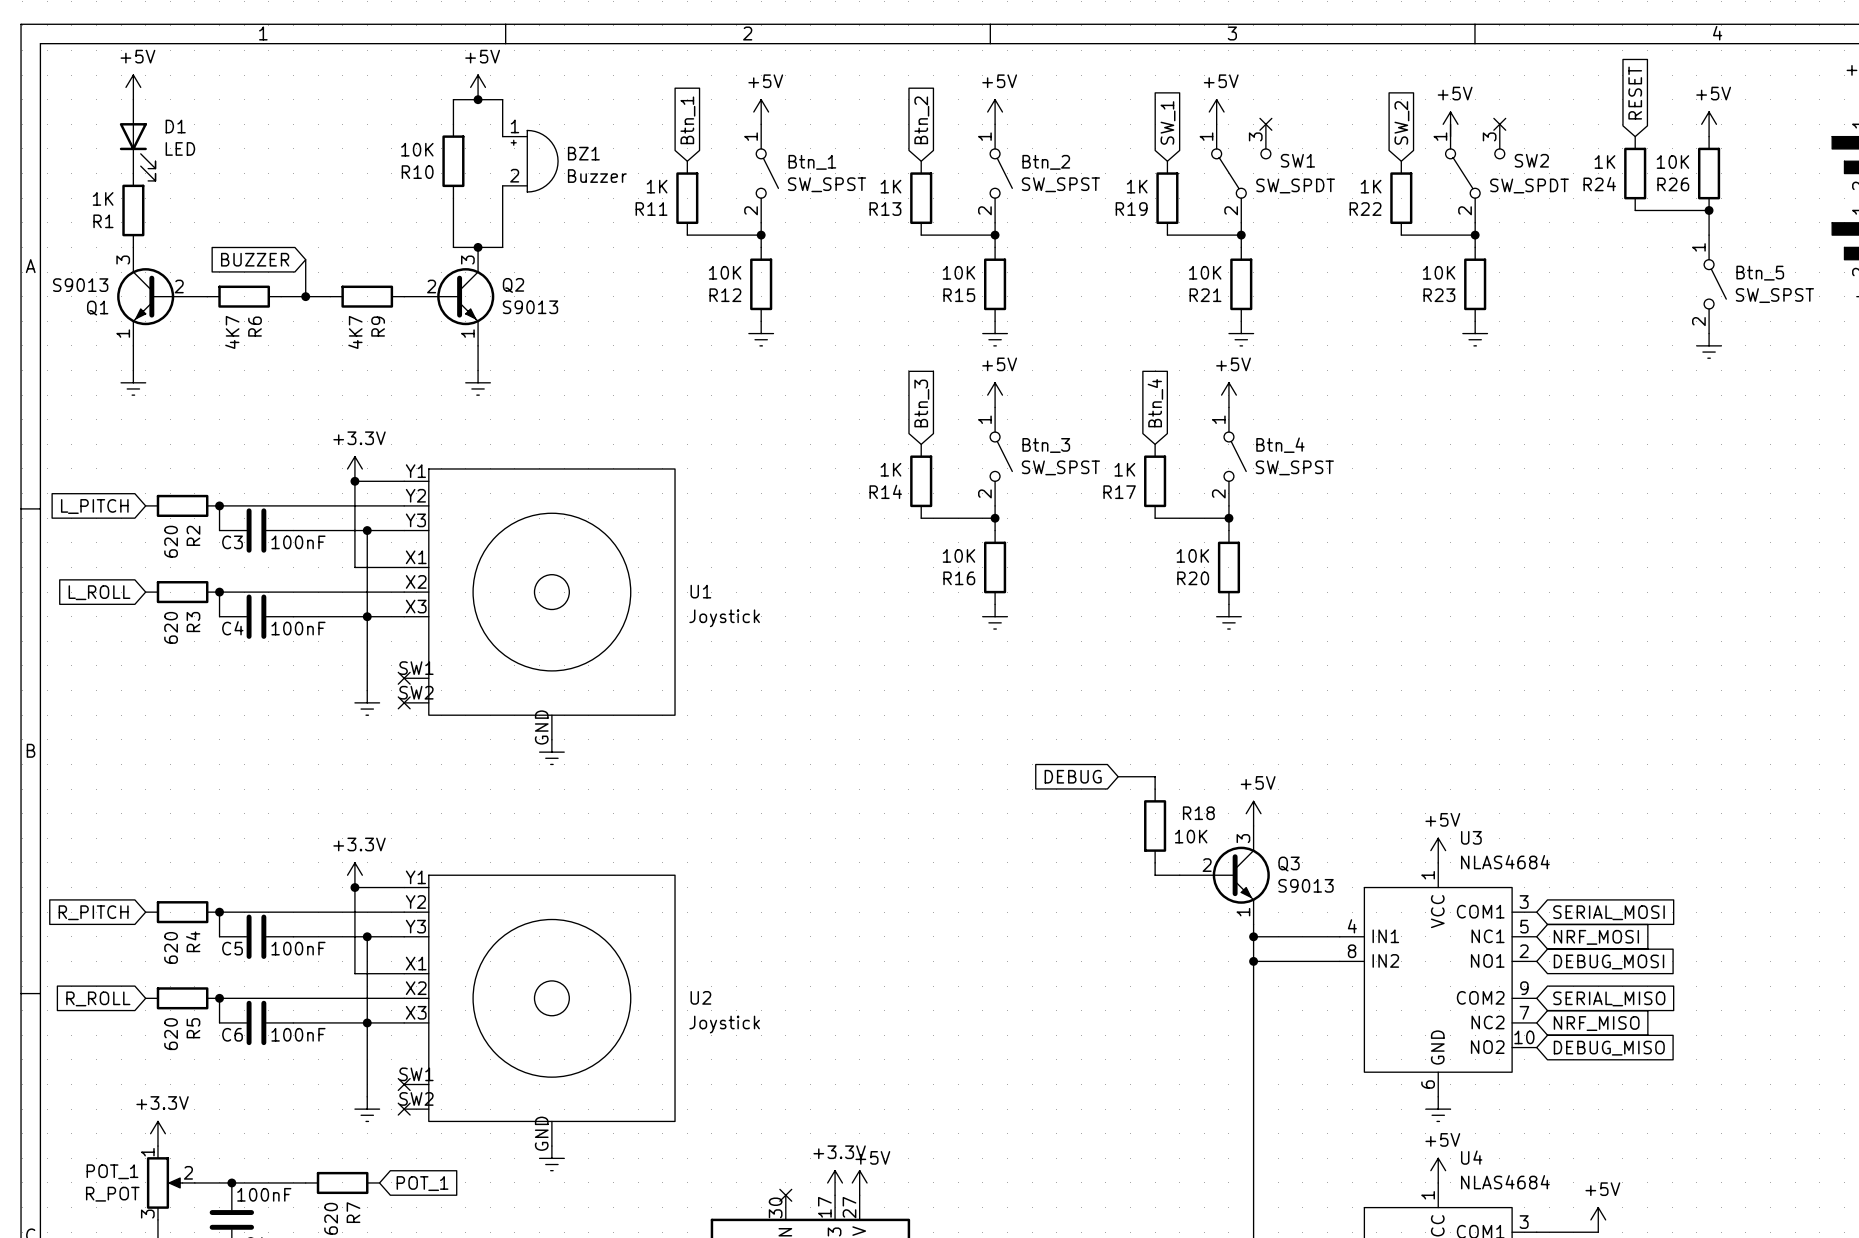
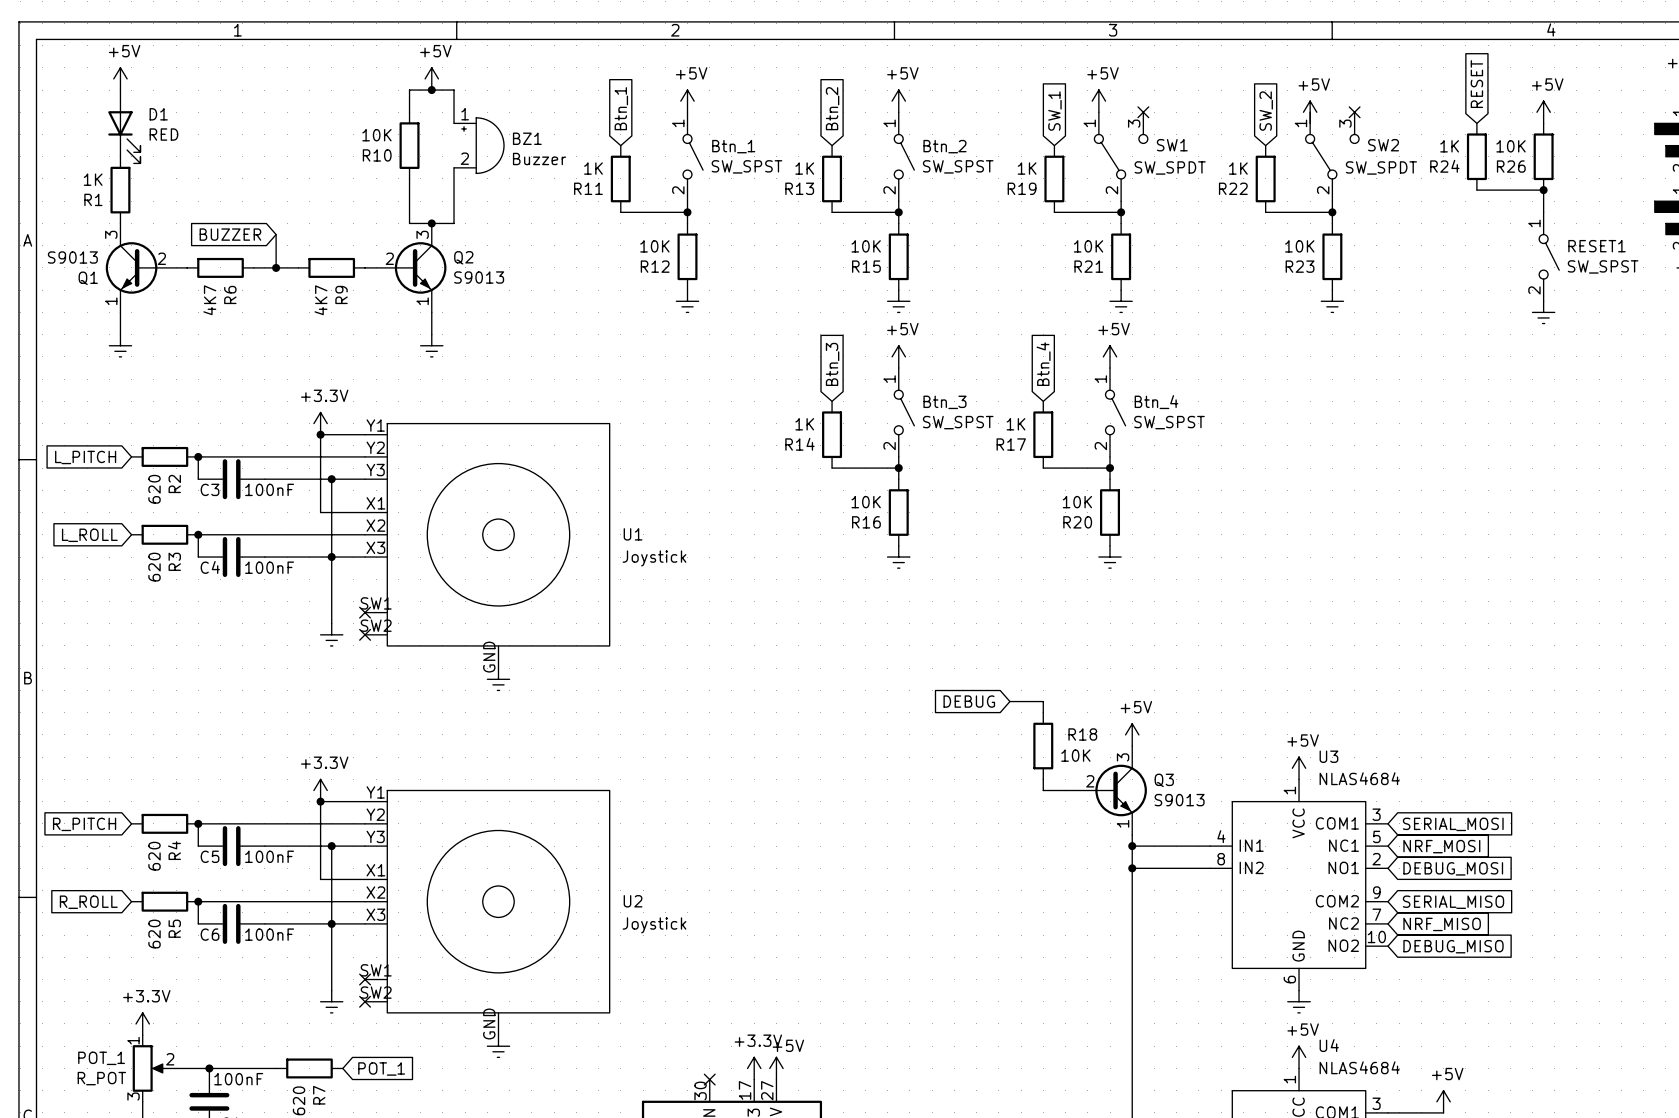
D1 value: LED (180, 148) -> RED (163, 134)
Btn_5 name: Btn_5 (1760, 273) -> RESET1 (1597, 246)

